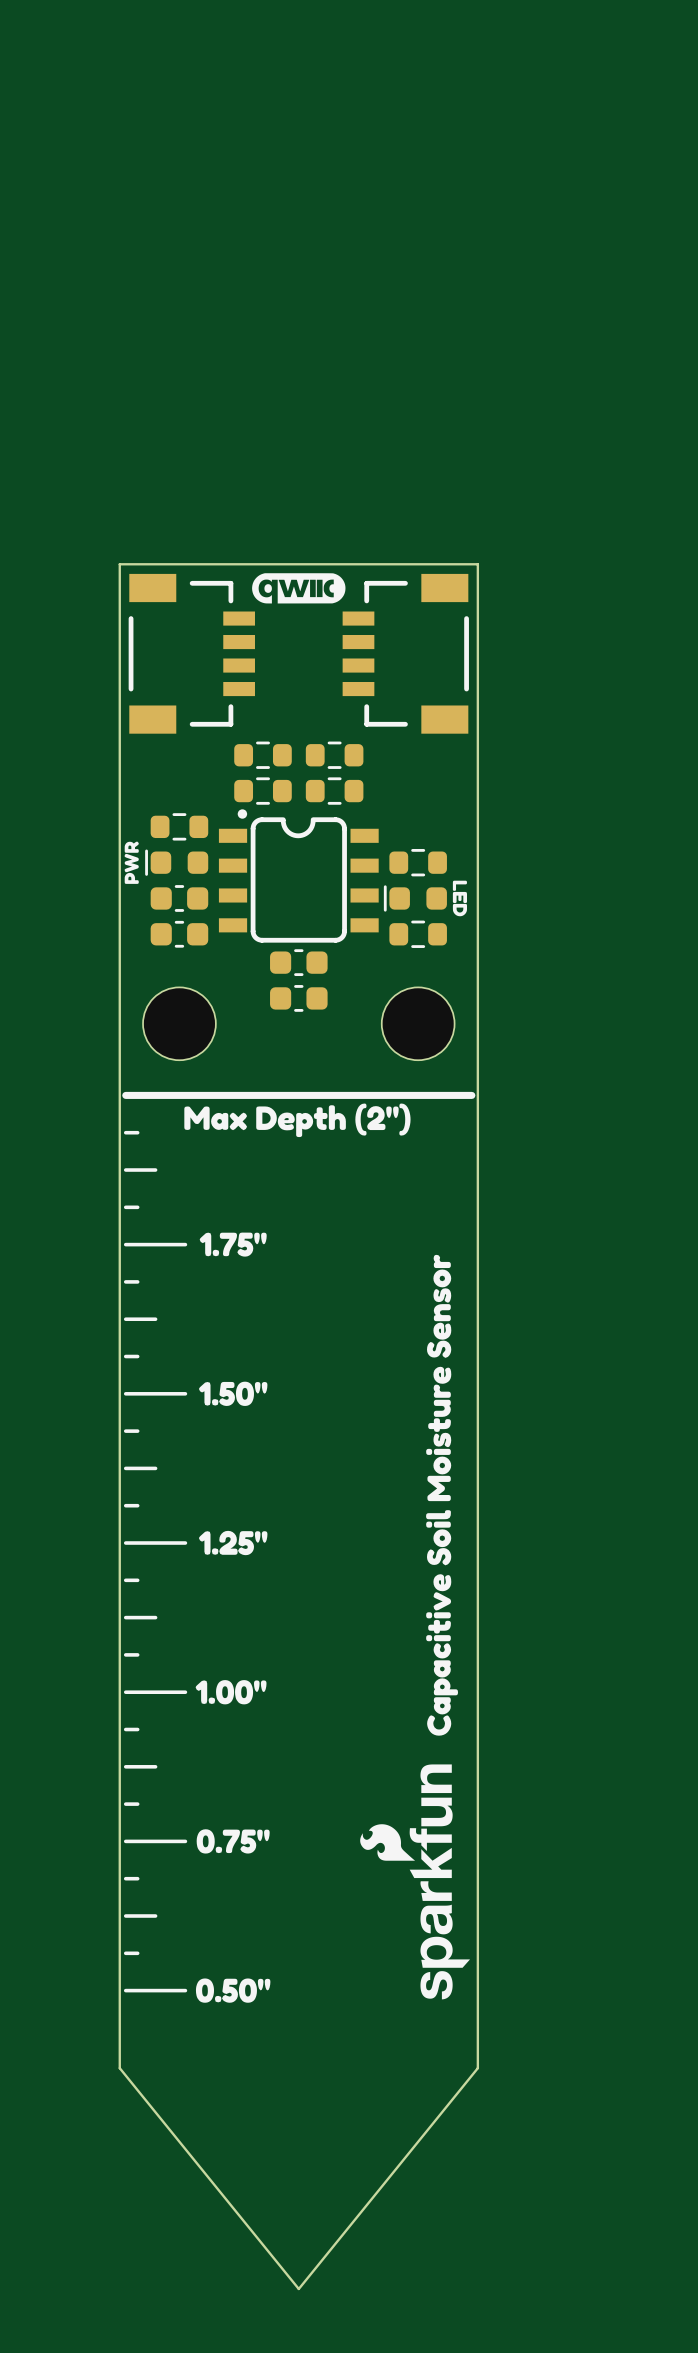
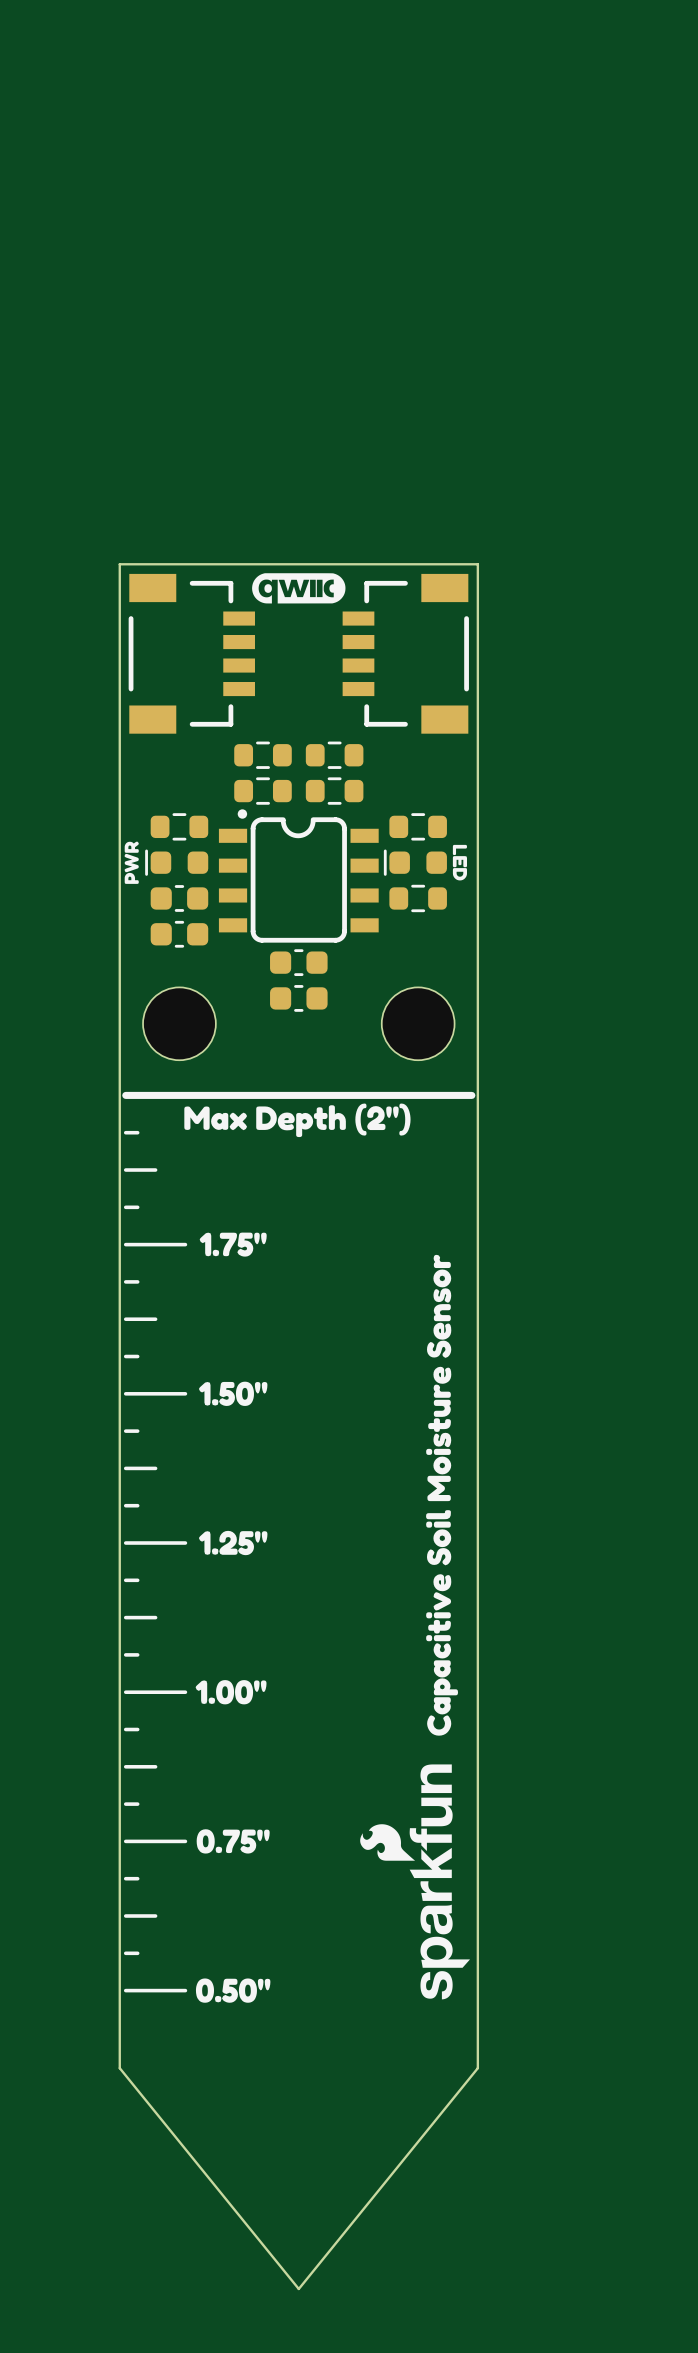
part footprint: [389, 848, 447, 877] -> [383, 849, 447, 876]
part footprint: [383, 885, 447, 912] -> [389, 884, 447, 913]
drawing position: (459, 898) -> (459, 862)
part position: (418, 934) -> (418, 826)

